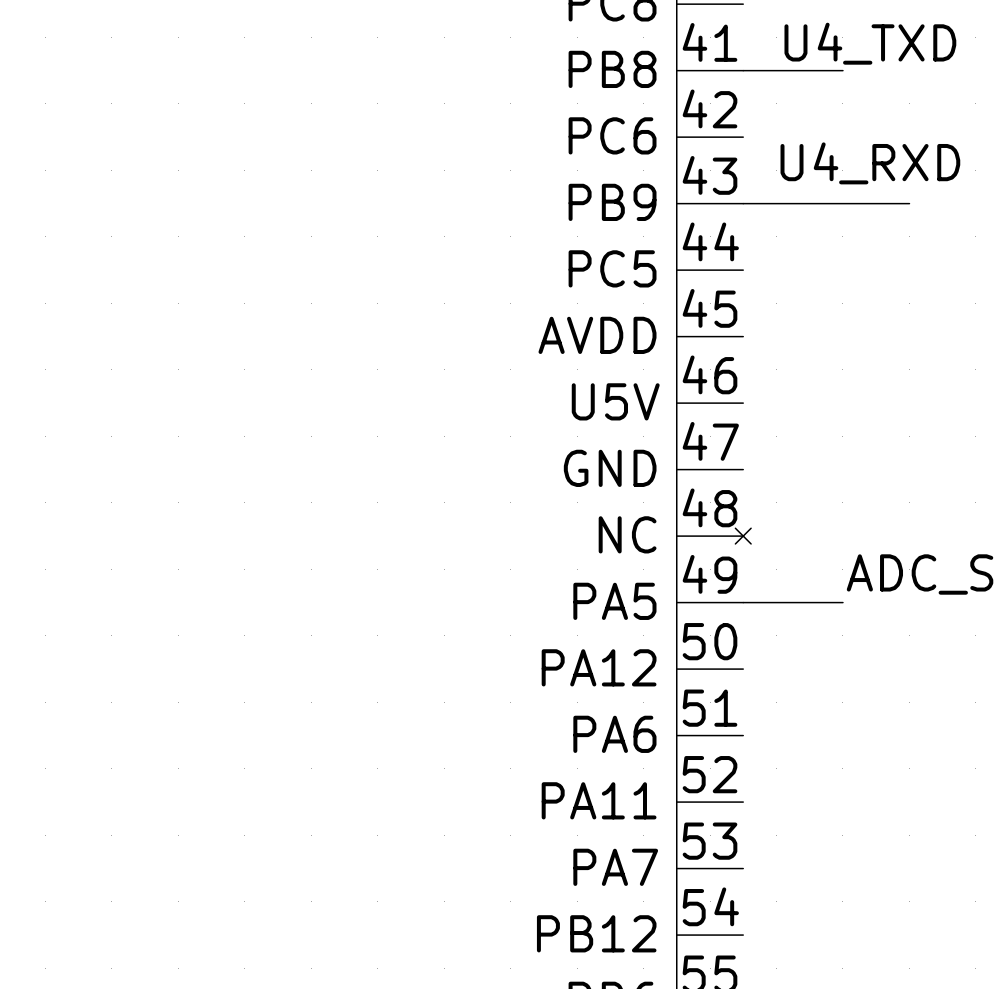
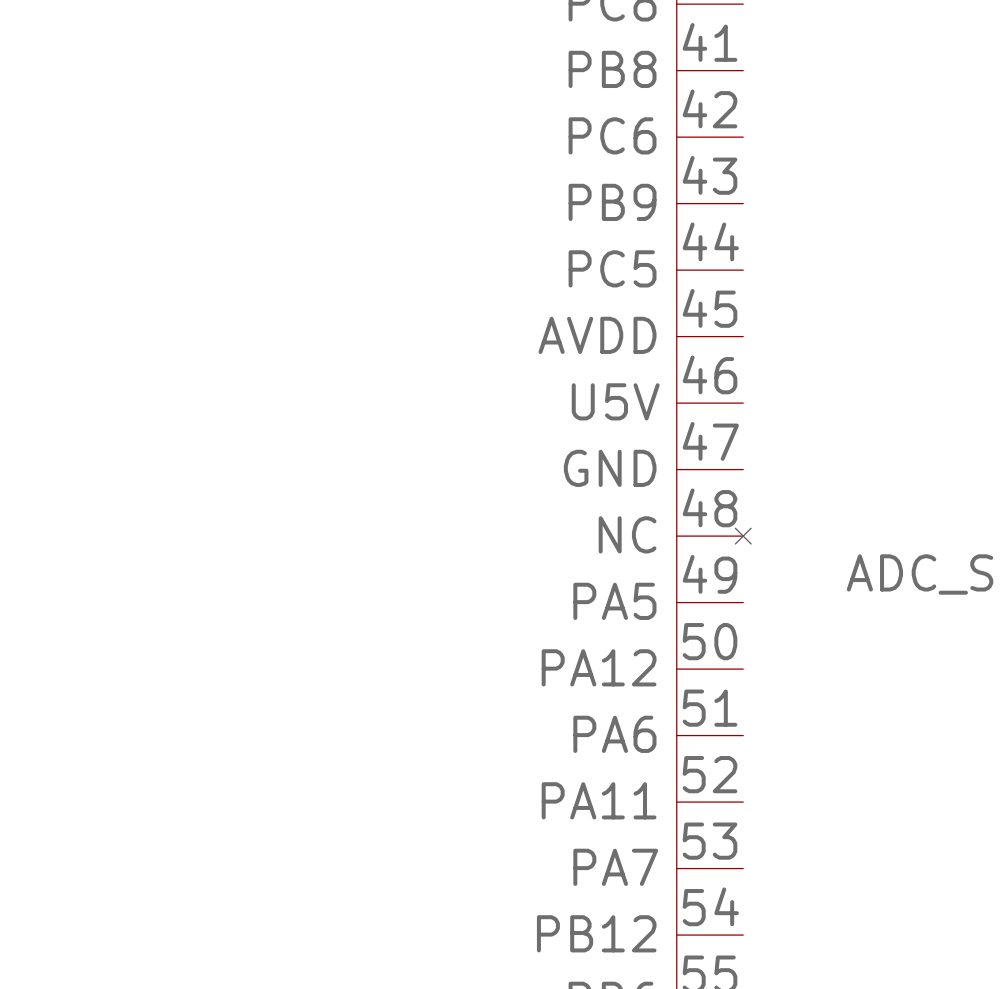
text: U4_TXD (870, 43) -> none
wire: (743, 70) (842, 70) -> none
text: U4_RXD (870, 163) -> none
wire: (743, 203) (909, 203) -> none
wire: (743, 602) (842, 602) -> none

